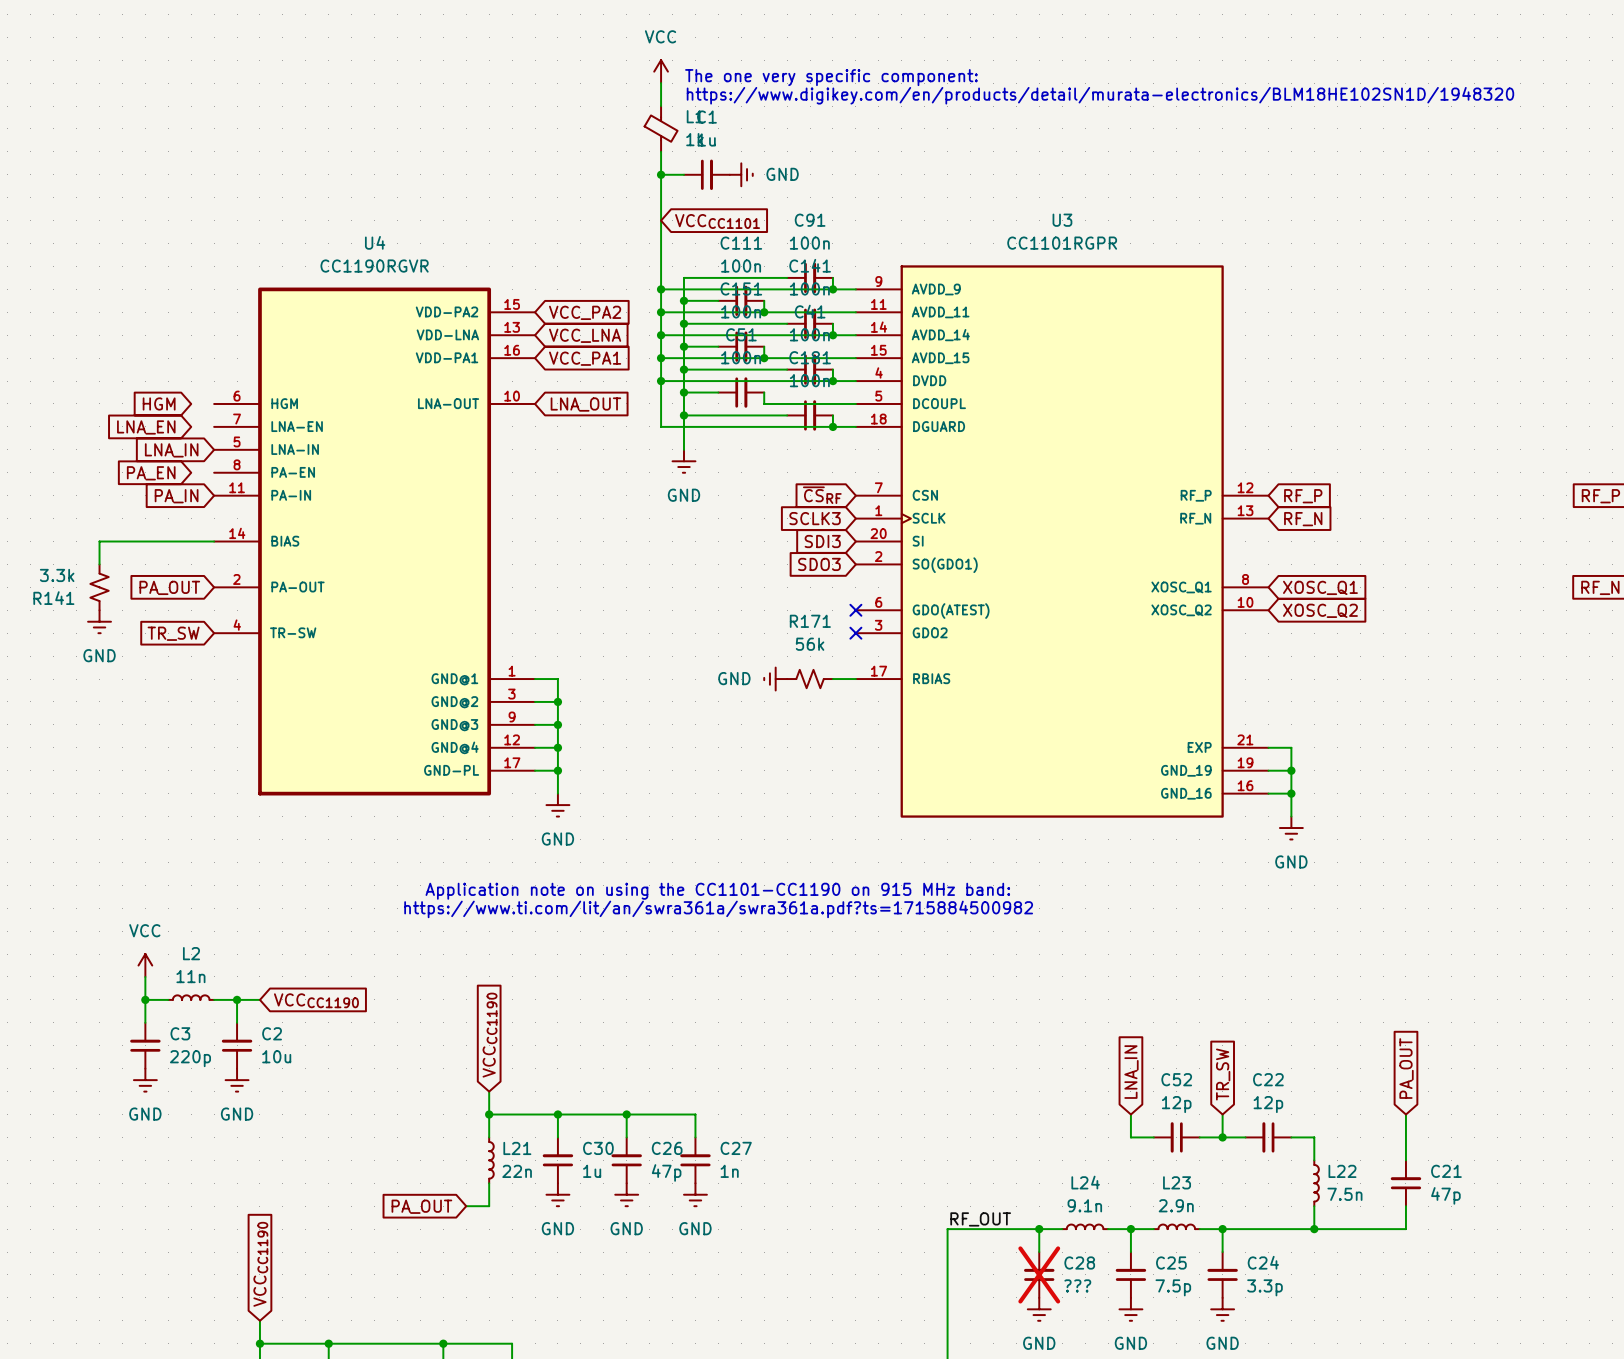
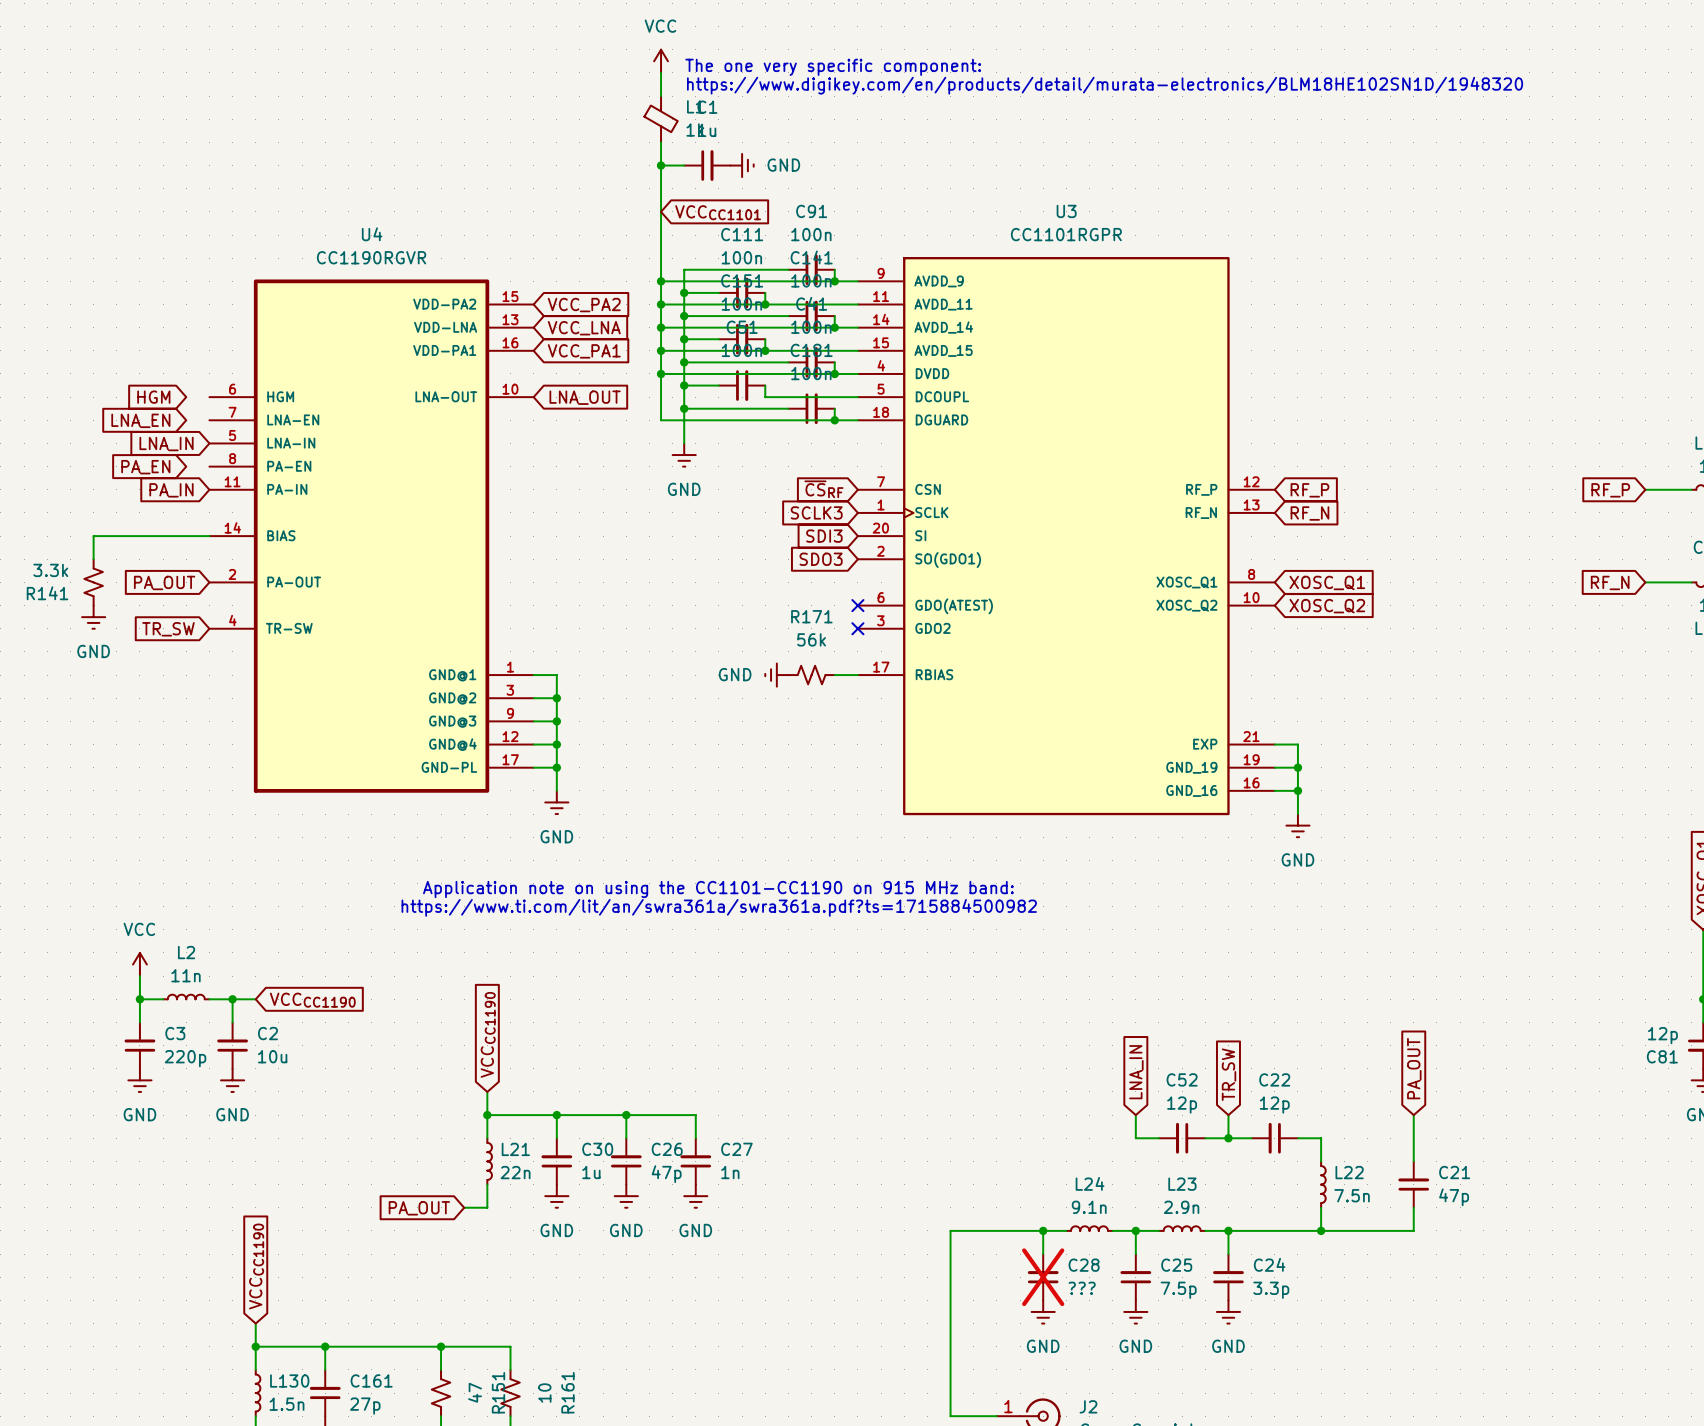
label: RF_OUT (980, 1219) -> none

